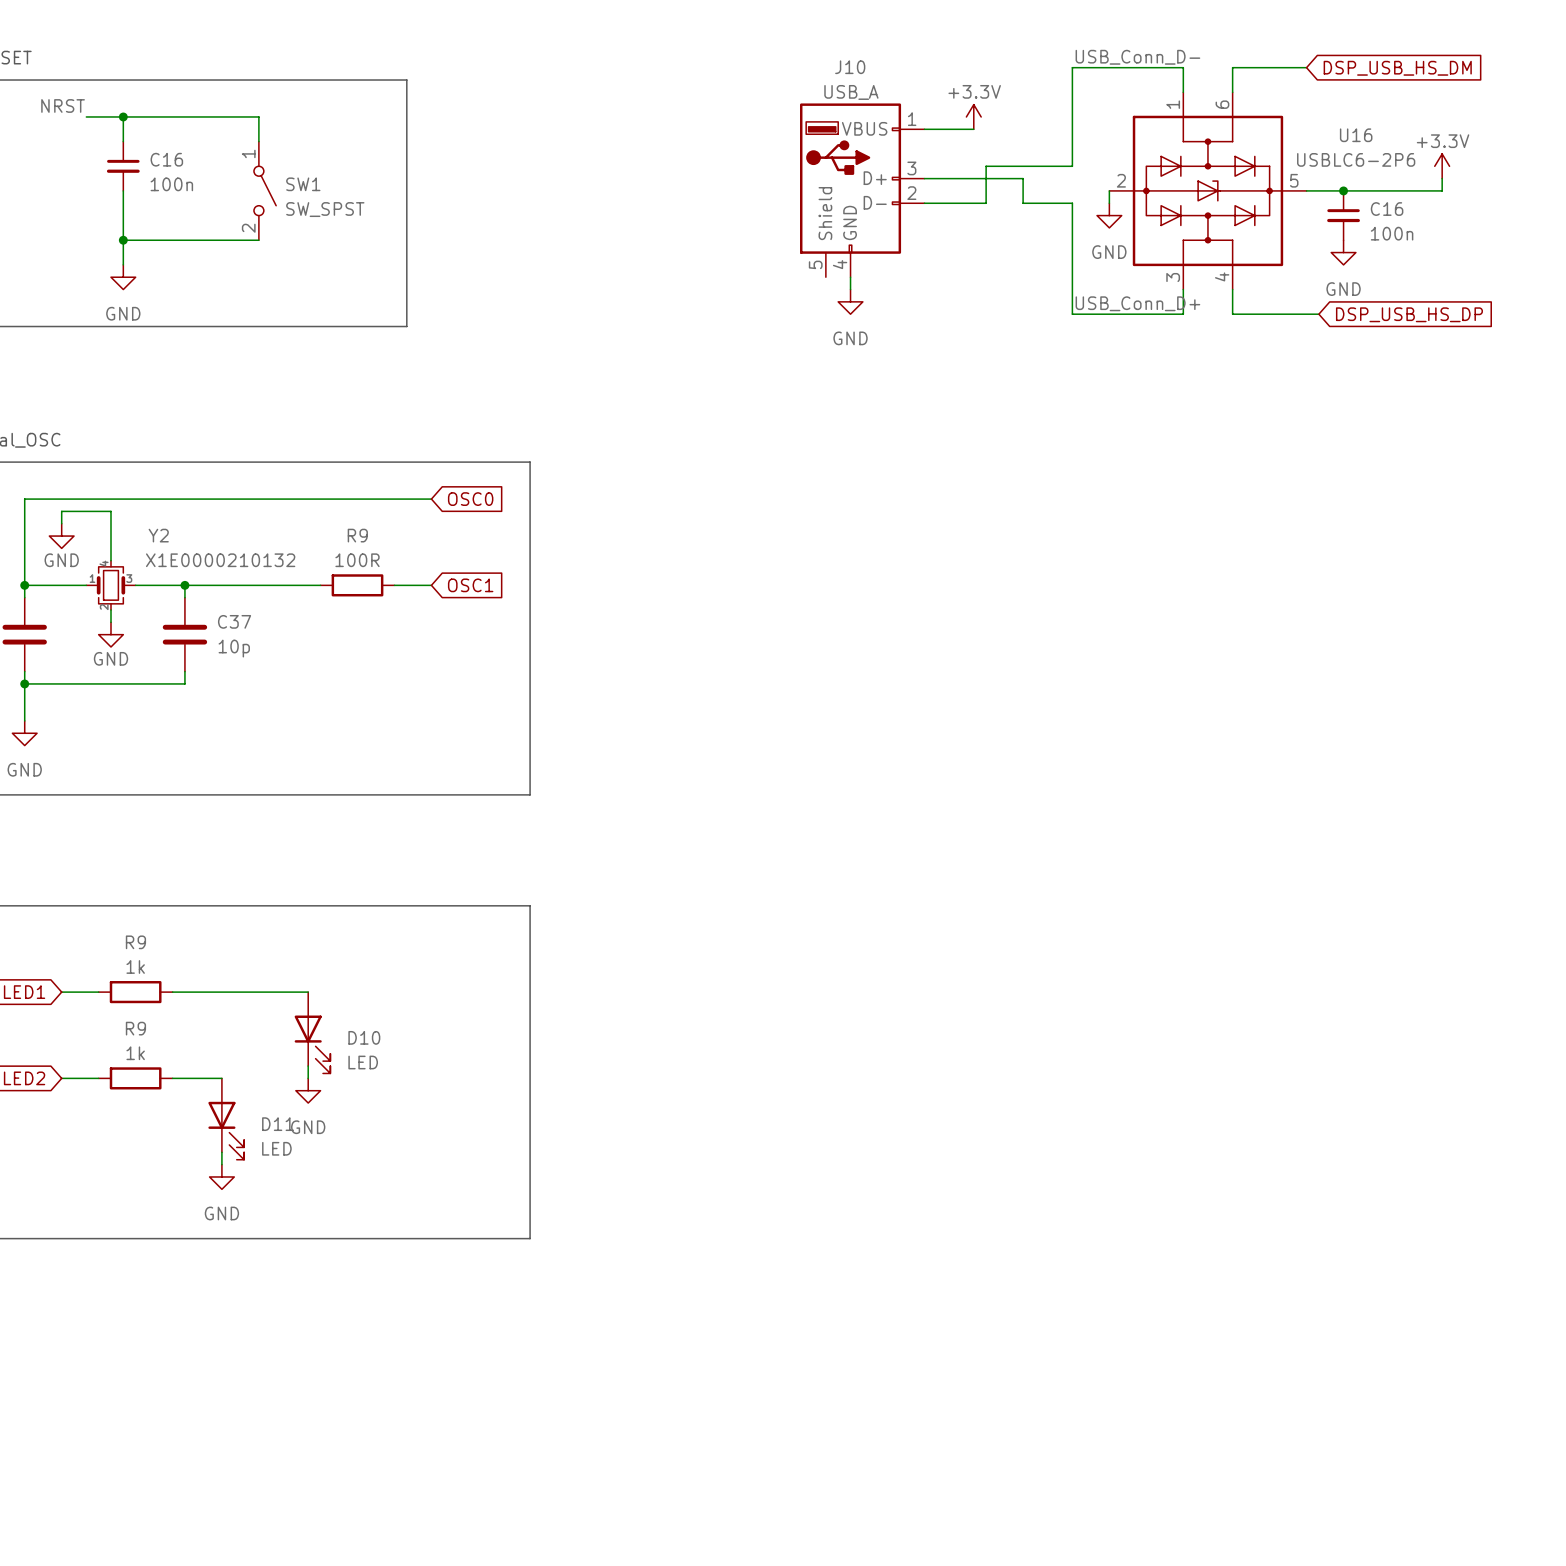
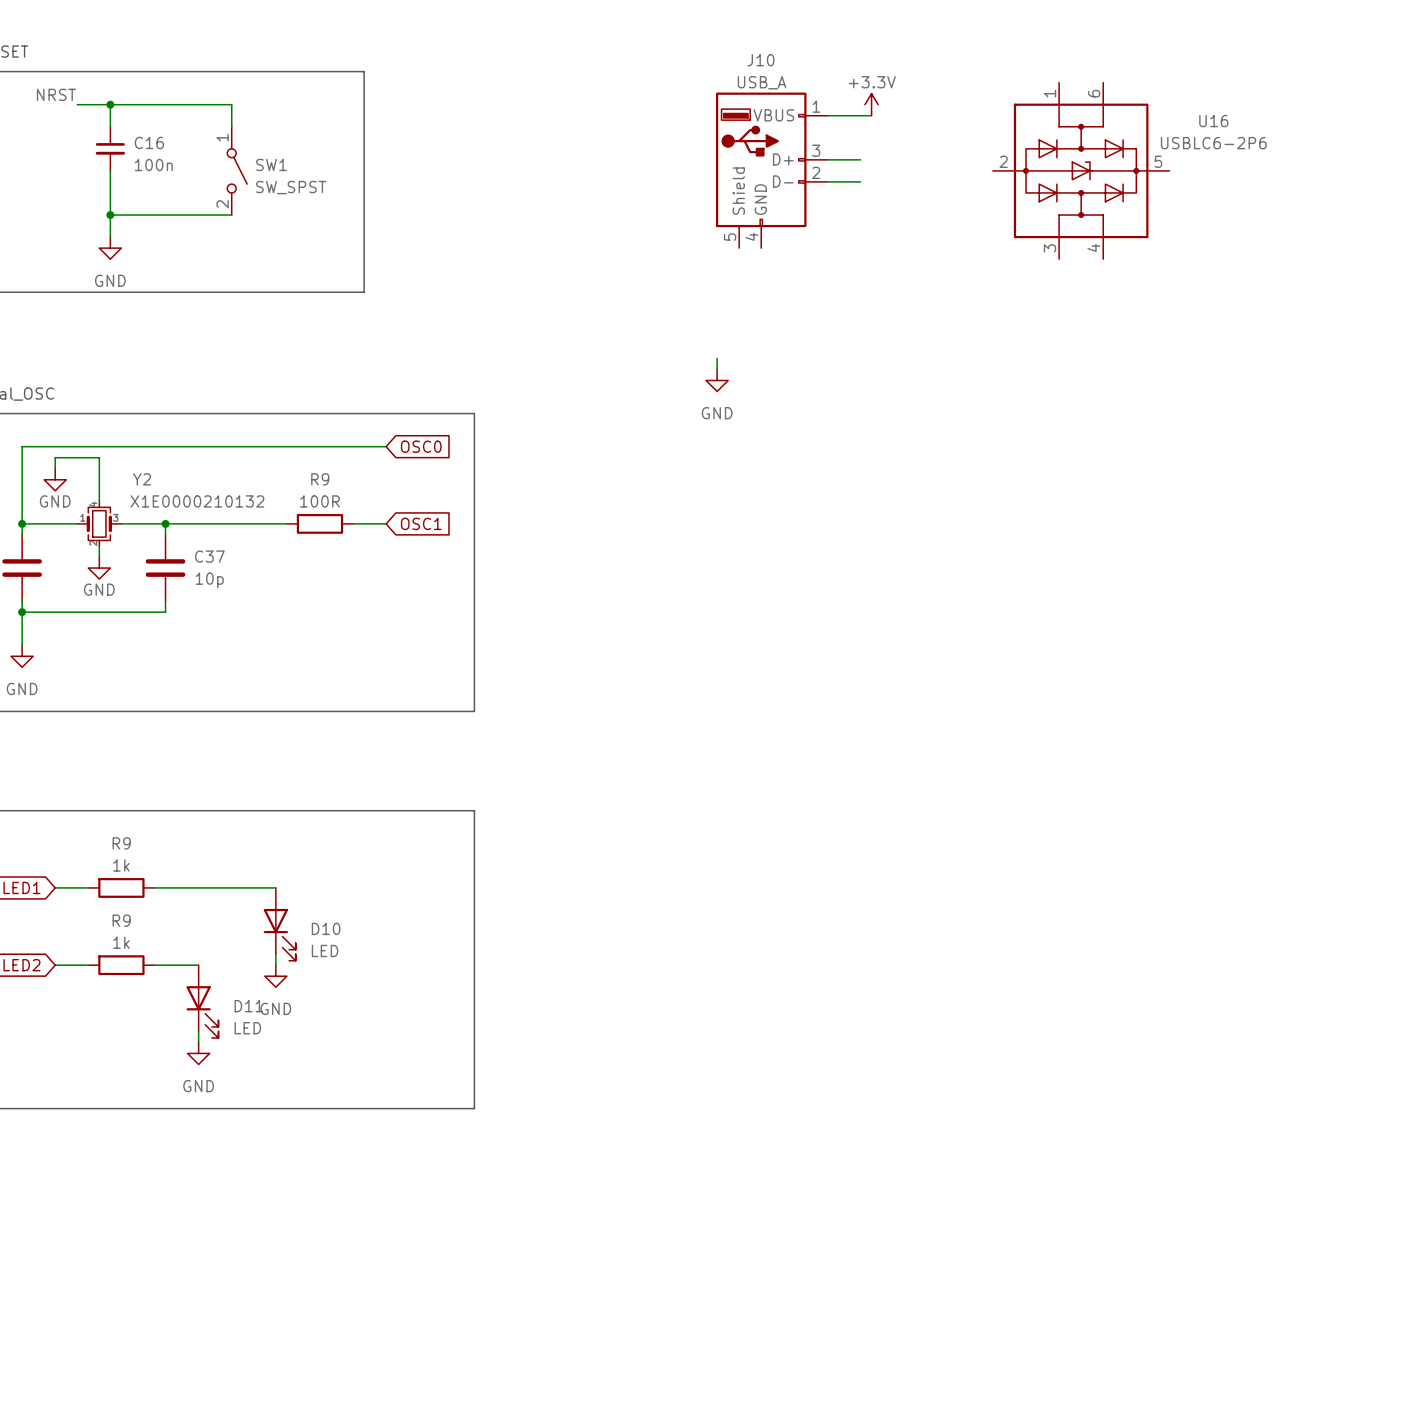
label: USB_Conn_D- (1137, 57) -> none
wire: (1306, 67) (1232, 67) (1232, 92) -> none
global label: DSP_USB_HS_DM (1397, 68) -> none
wire: (1183, 92) (1183, 67) (1072, 67) (1072, 166) (986, 166) (986, 203) (961, 203) -> none
power symbol: +3.3V (1442, 166) -> none
wire: (961, 178) (1023, 178) (1023, 203) (1072, 203) (1072, 314) (1183, 314) (1183, 289) -> none
wire: (1442, 178) (1442, 190) (1306, 190) -> none
wire: (1109, 190) (1109, 203) -> none
junction: (1343, 190) -> none
power symbol: GND (1109, 215) -> none
C16: 100n (1343, 215) -> none
power symbol: GND (1343, 252) -> none
wire: (850, 277) (850, 289) -> (717, 358) (717, 369)
wire: (1232, 289) (1232, 314) (1318, 314) -> none
power symbol position: GND (850, 301) -> GND (717, 380)
label: USB_Conn_D+ (1137, 303) -> none
global label: DSP_USB_HS_DP (1409, 314) -> none

